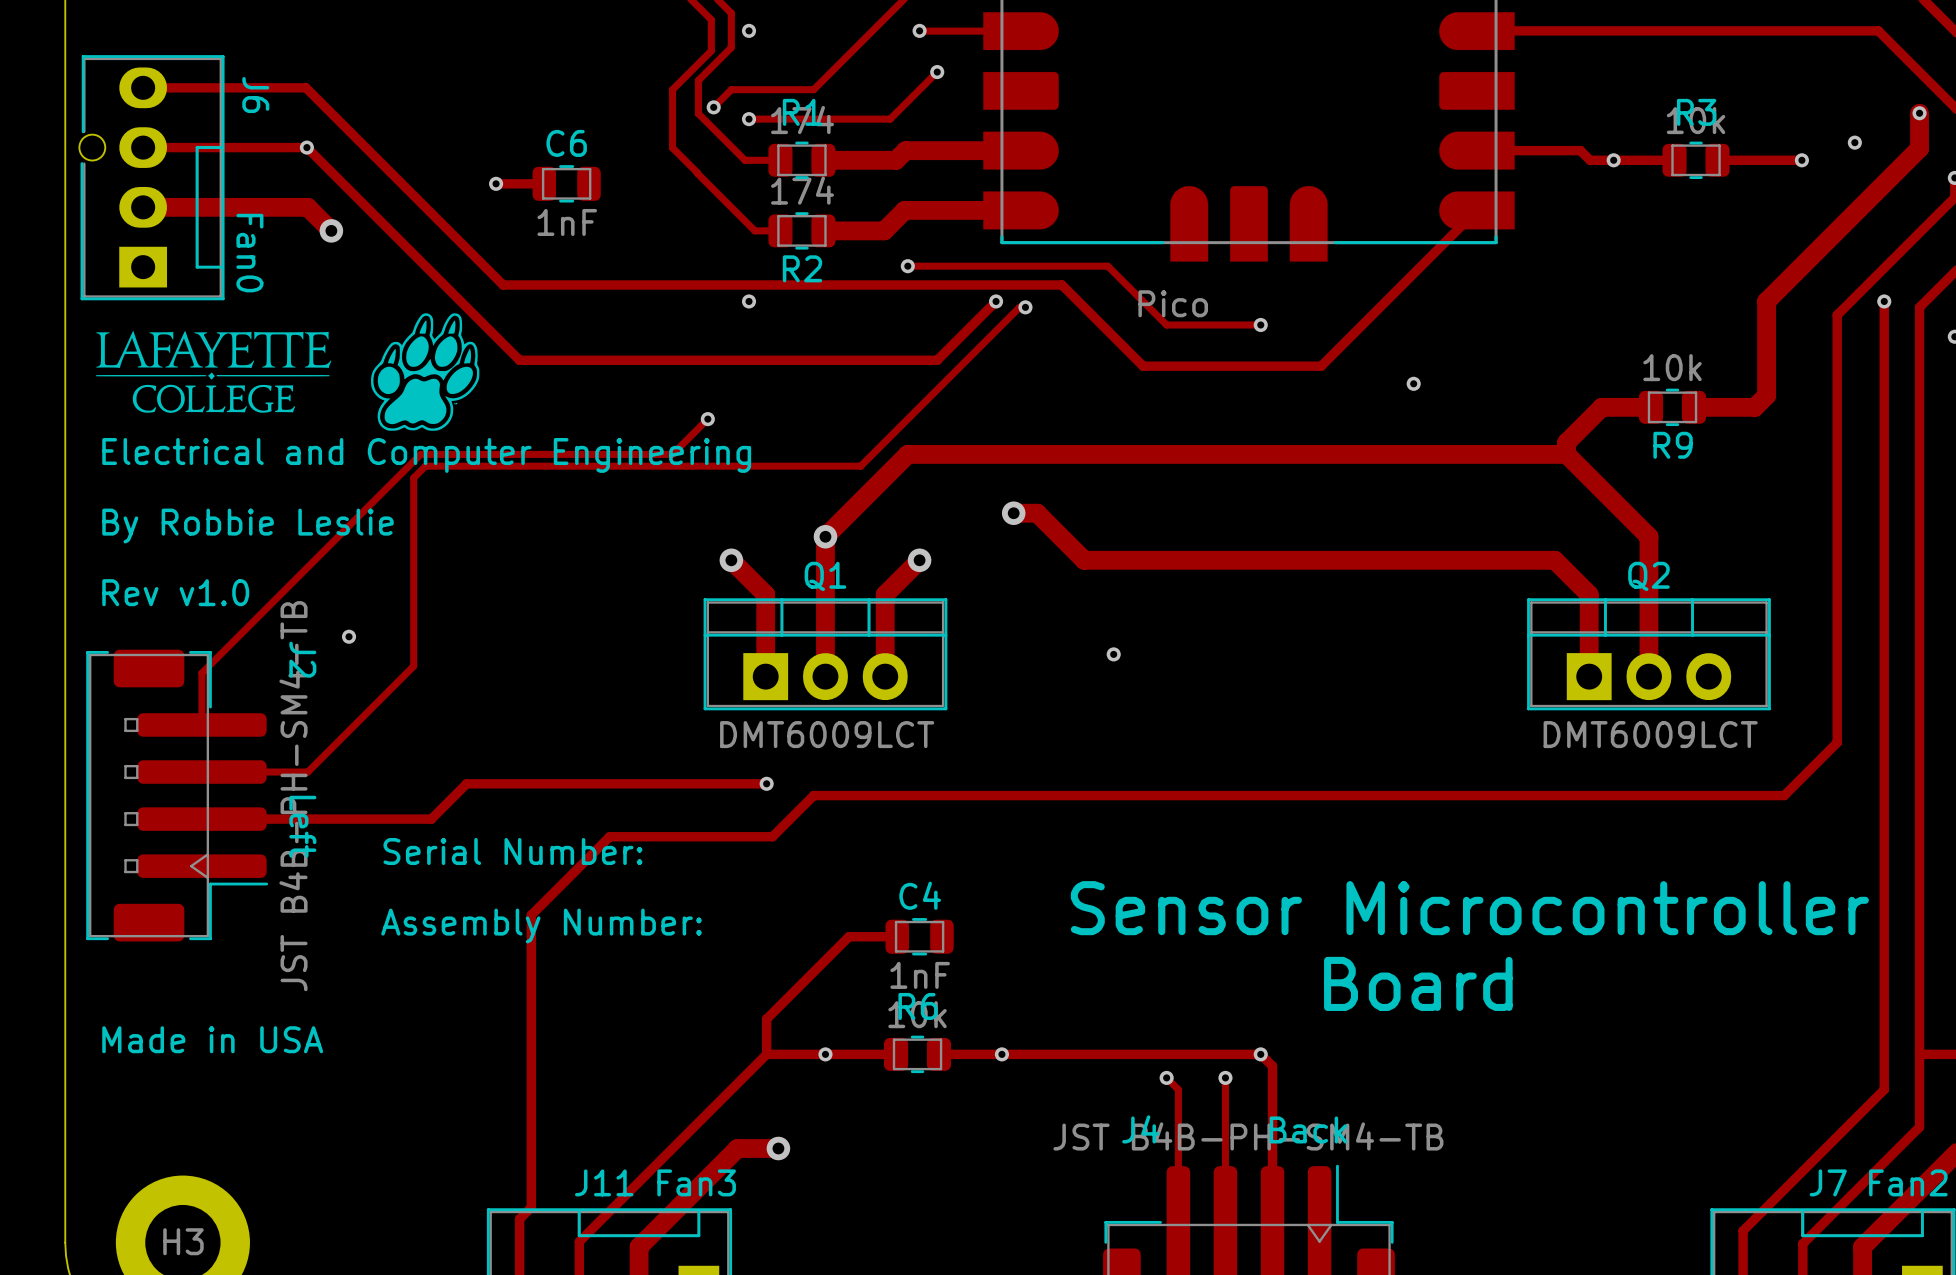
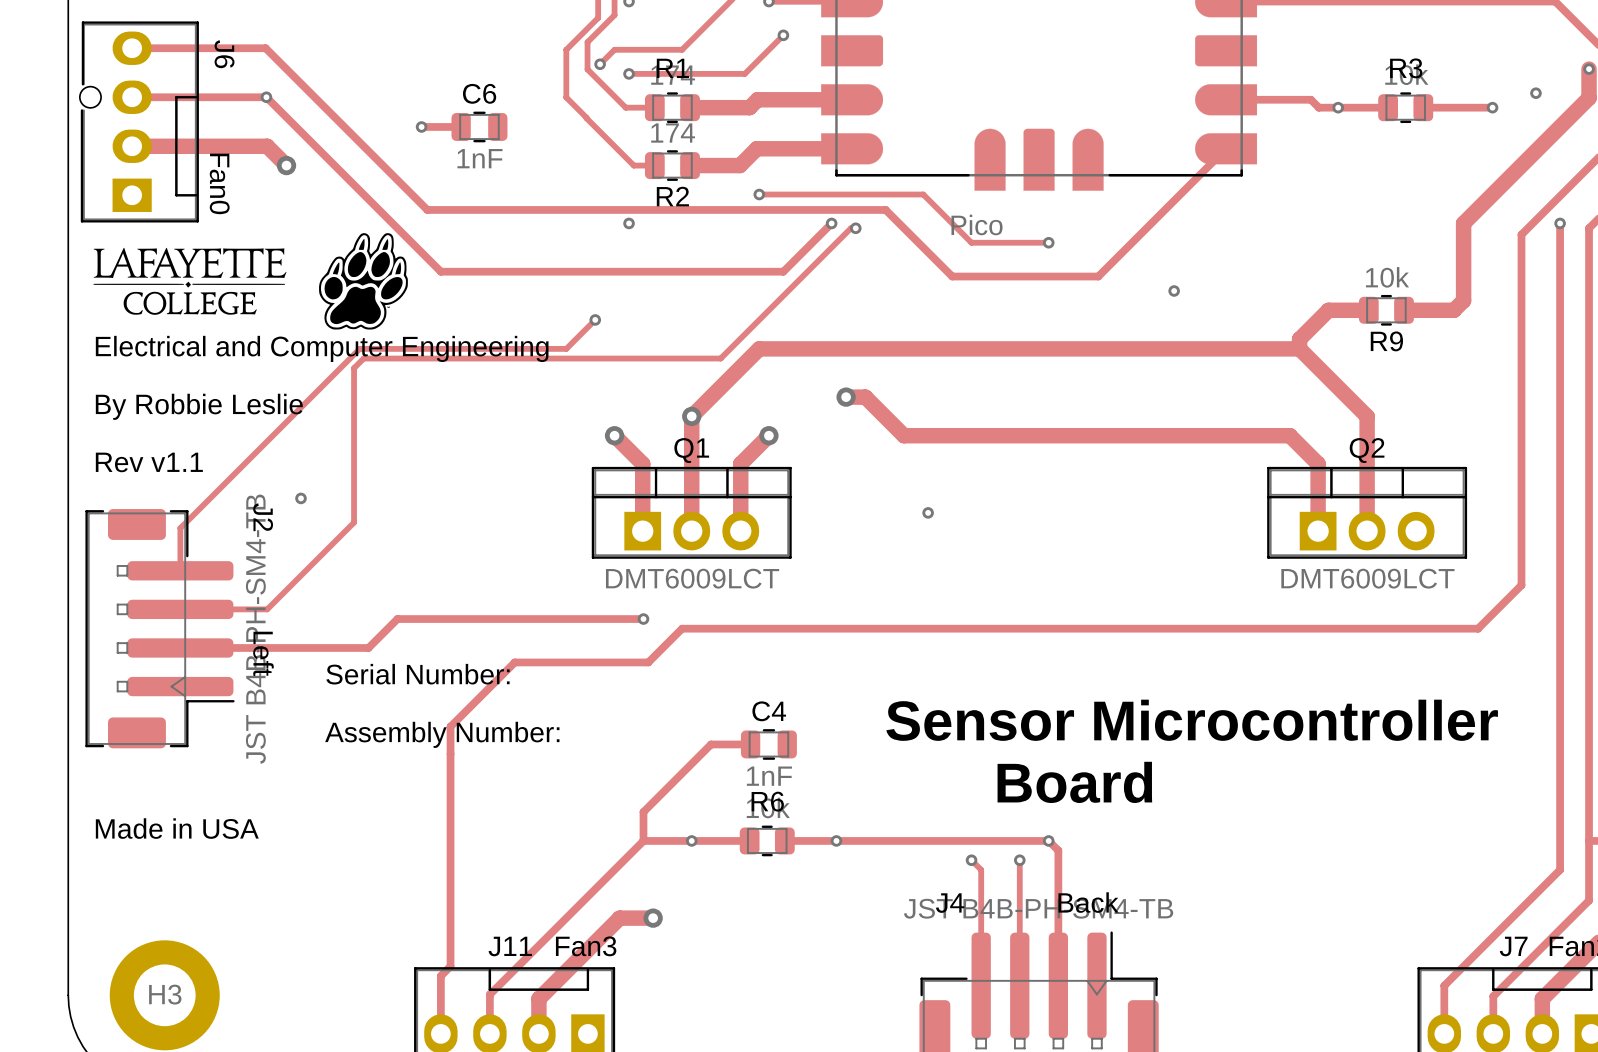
text: Rev v1.0 (175, 592) -> Rev v1.1 (149, 462)

